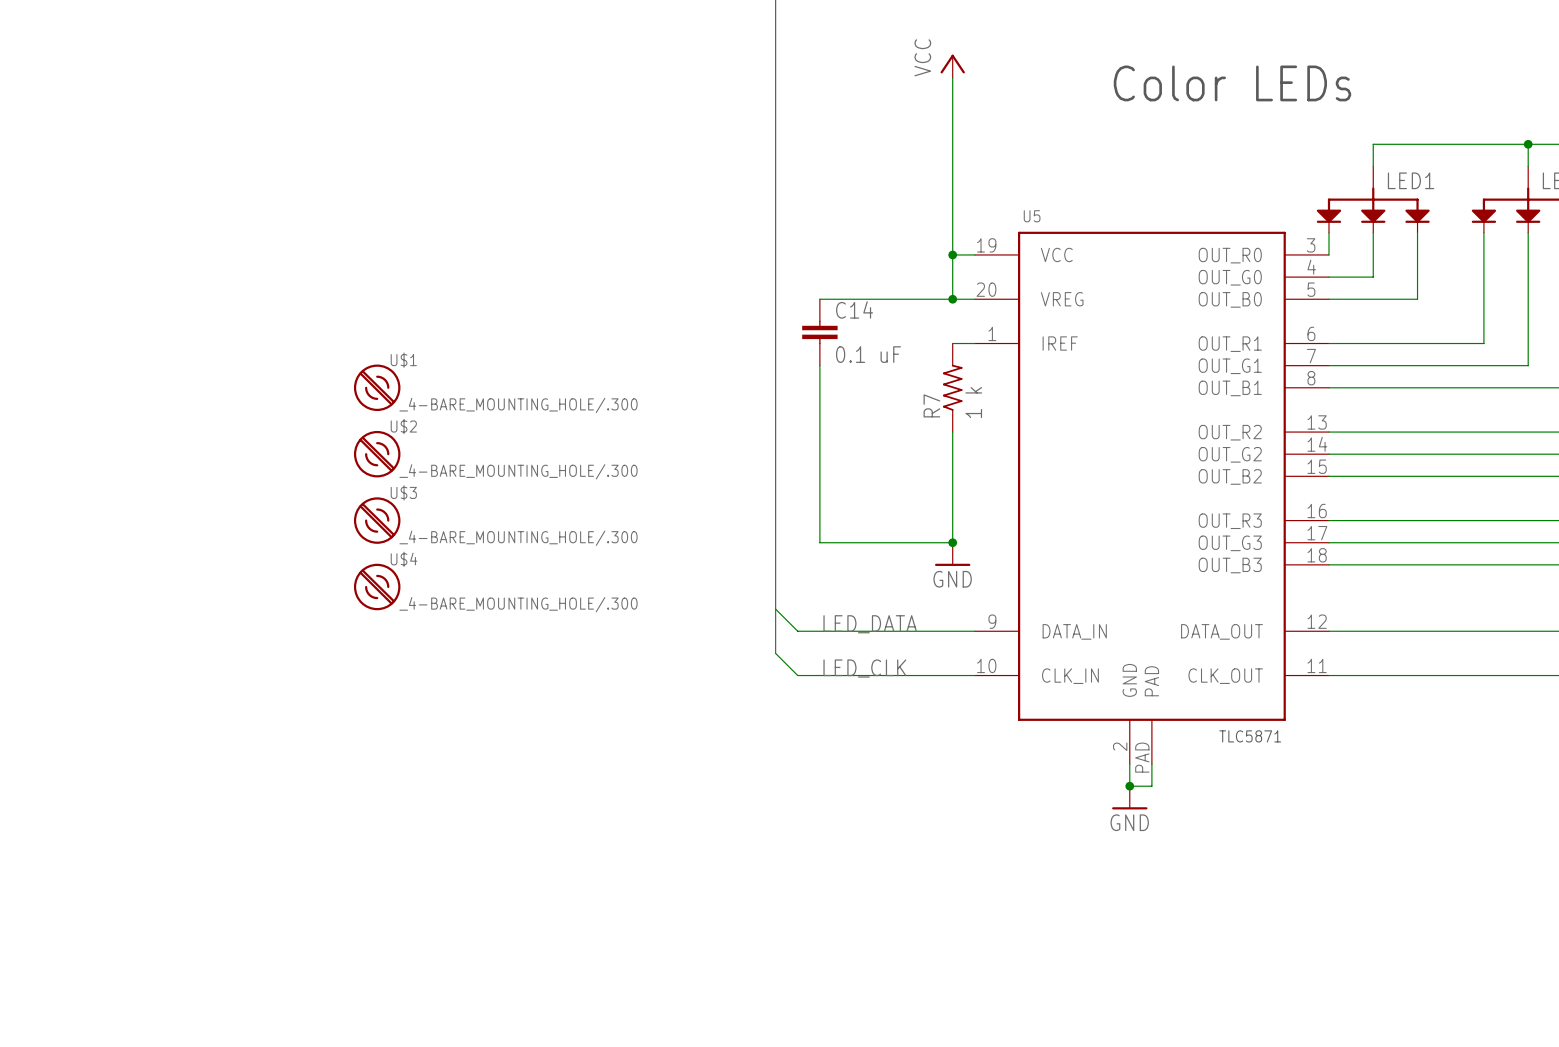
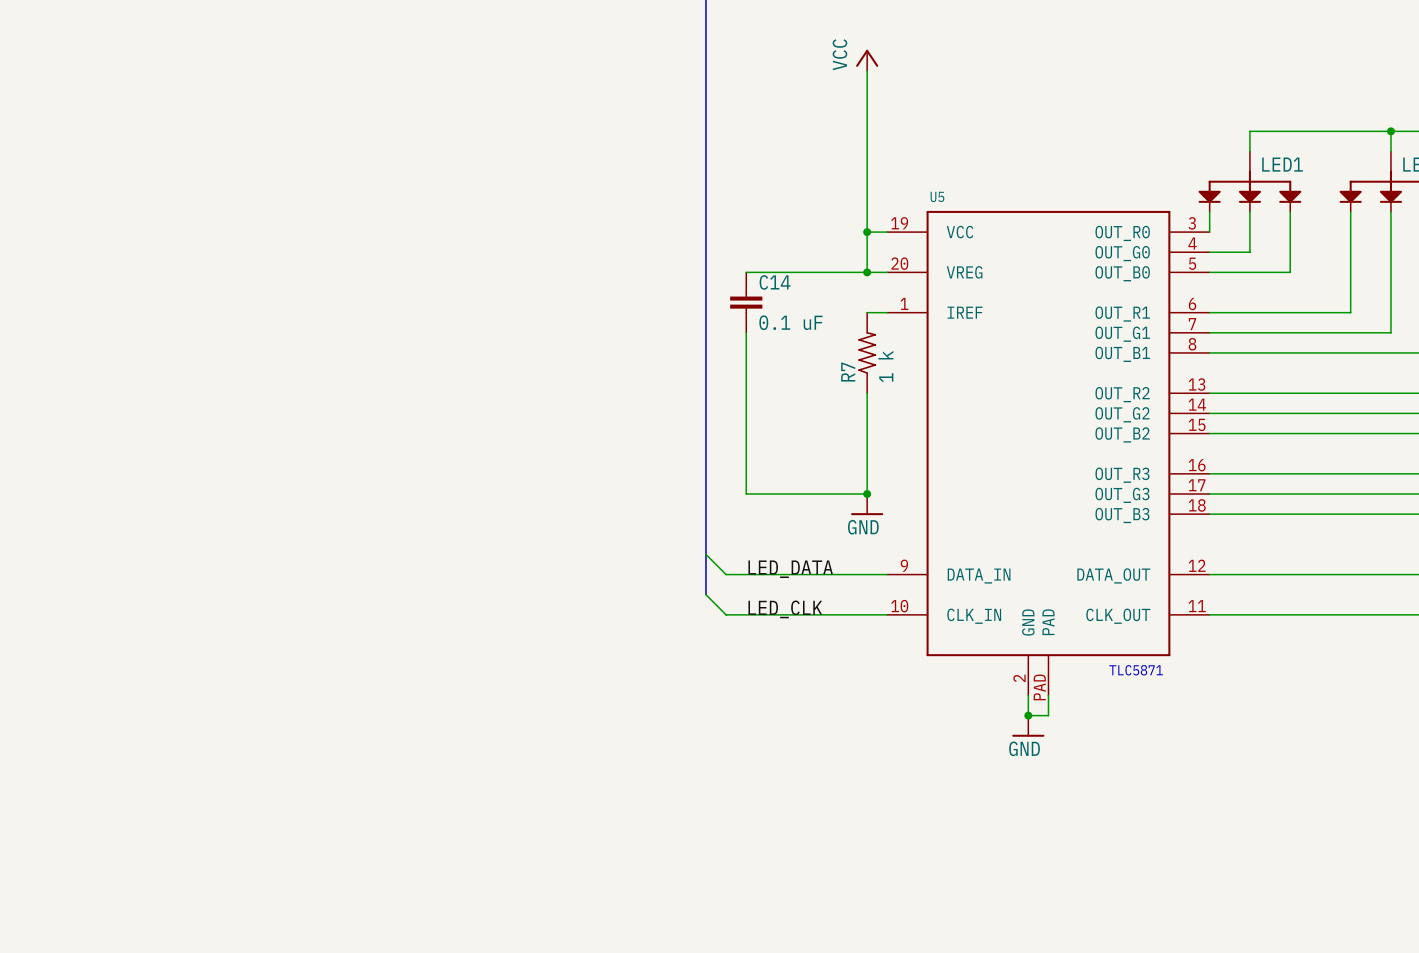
text: Color LEDs (1232, 83) -> none
U$1: _4-BARE_MOUNTING_HOLE/.300 (377, 387) -> none
U$2: _4-BARE_MOUNTING_HOLE/.300 (377, 454) -> none
U$3: _4-BARE_MOUNTING_HOLE/.300 (377, 520) -> none
U$4: _4-BARE_MOUNTING_HOLE/.300 (377, 586) -> none

